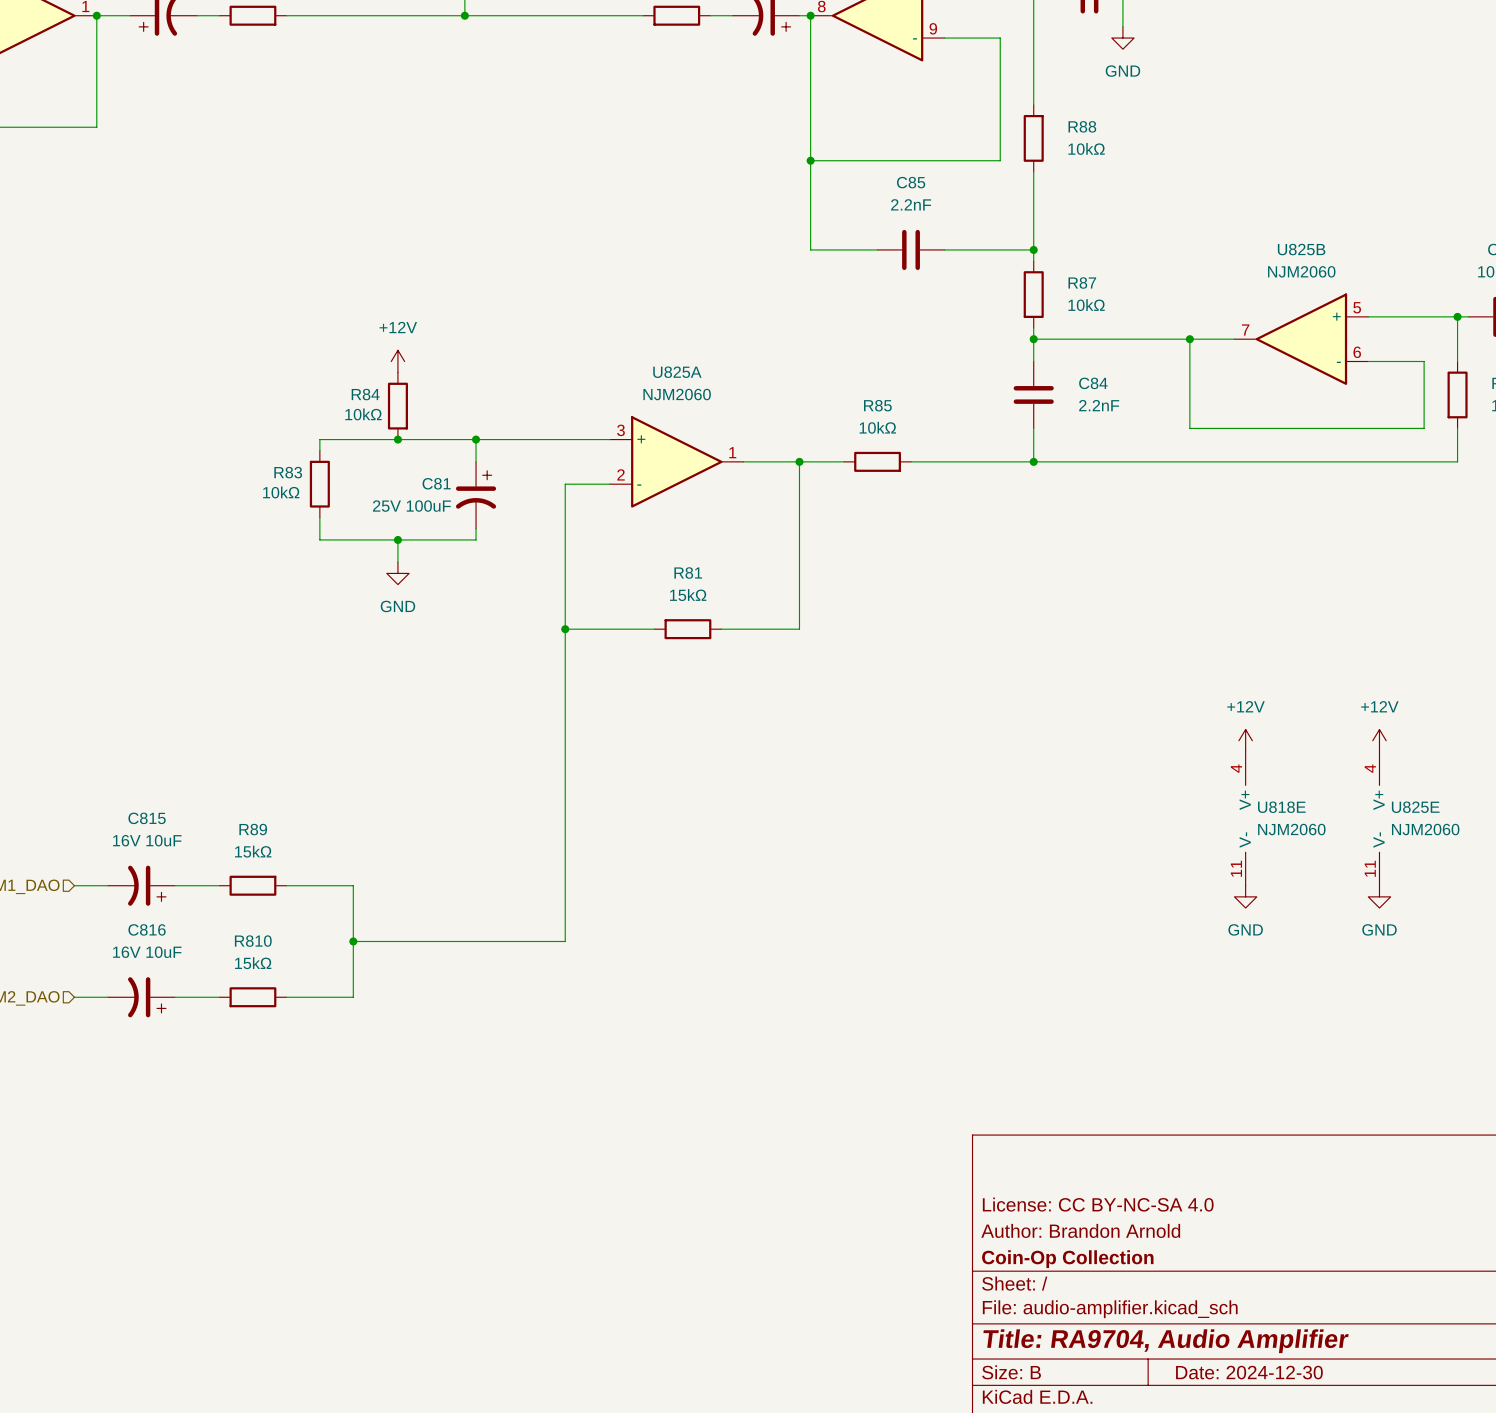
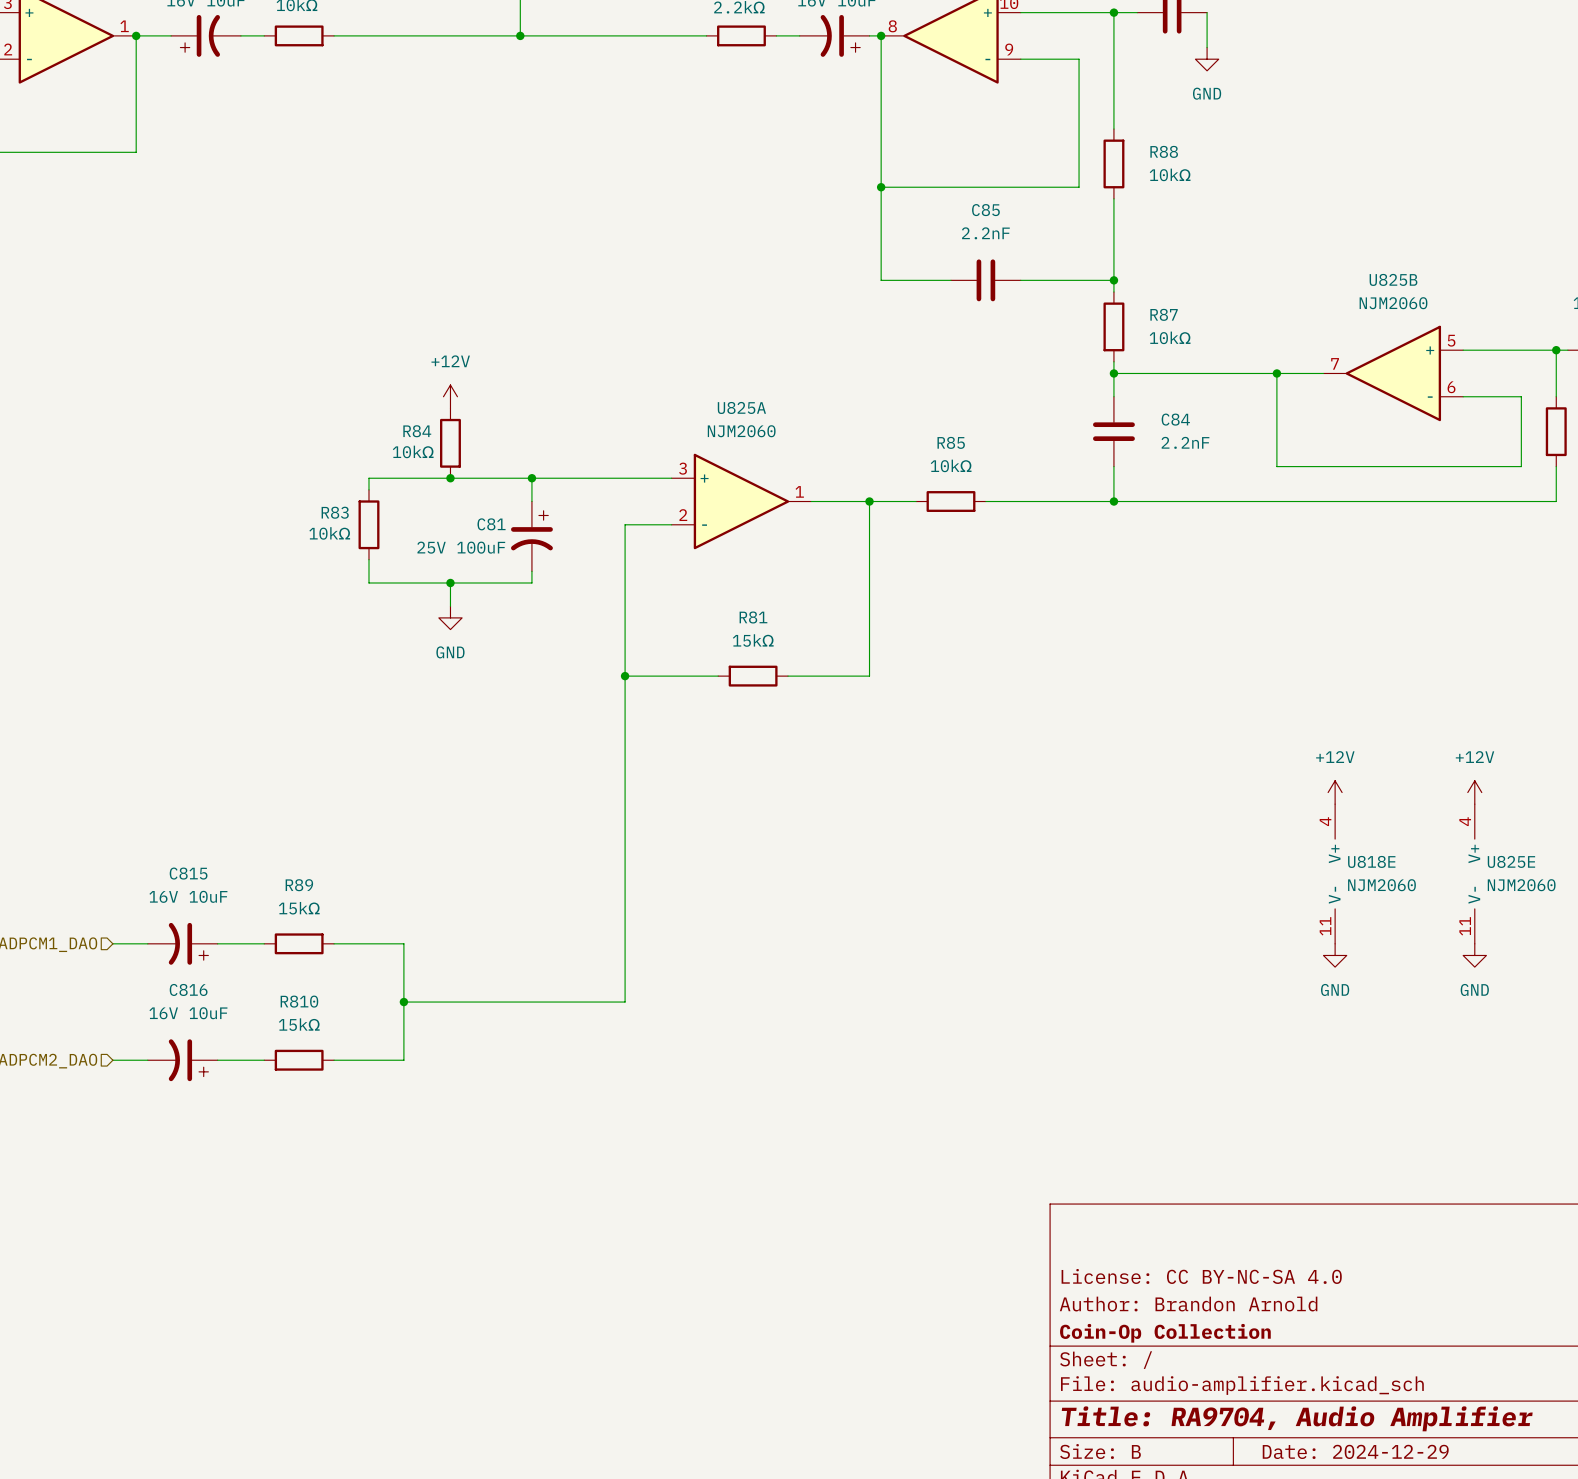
title block: Date: 2024-12-30 (1249, 1372) -> Date: 2024-12-29 (1355, 1451)

